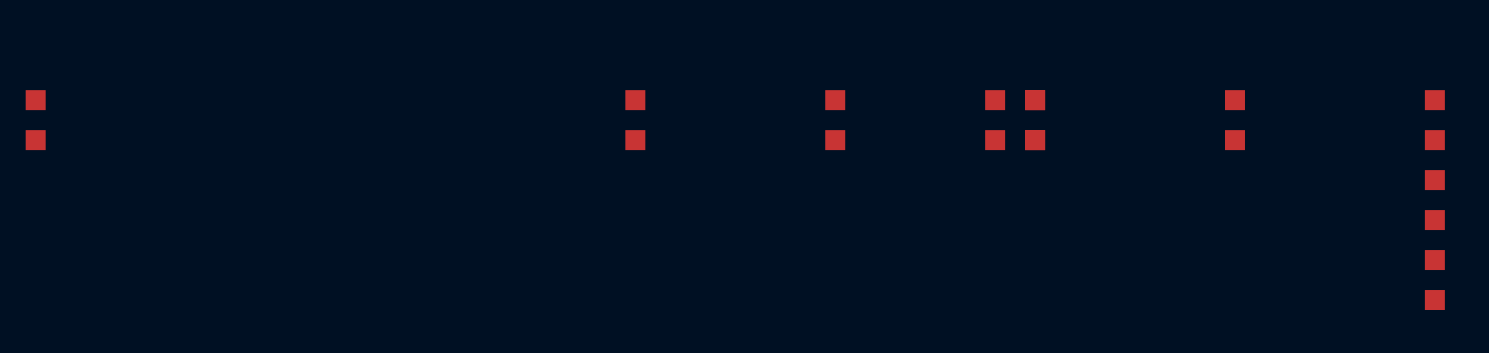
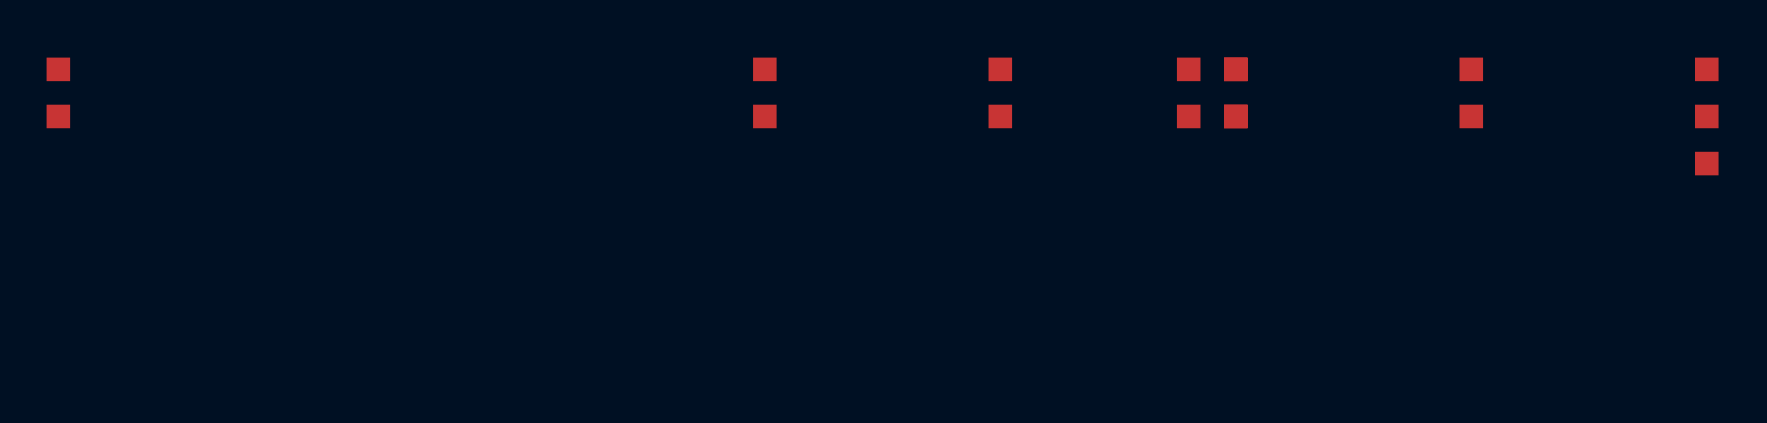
part: (1434, 200) -> none

